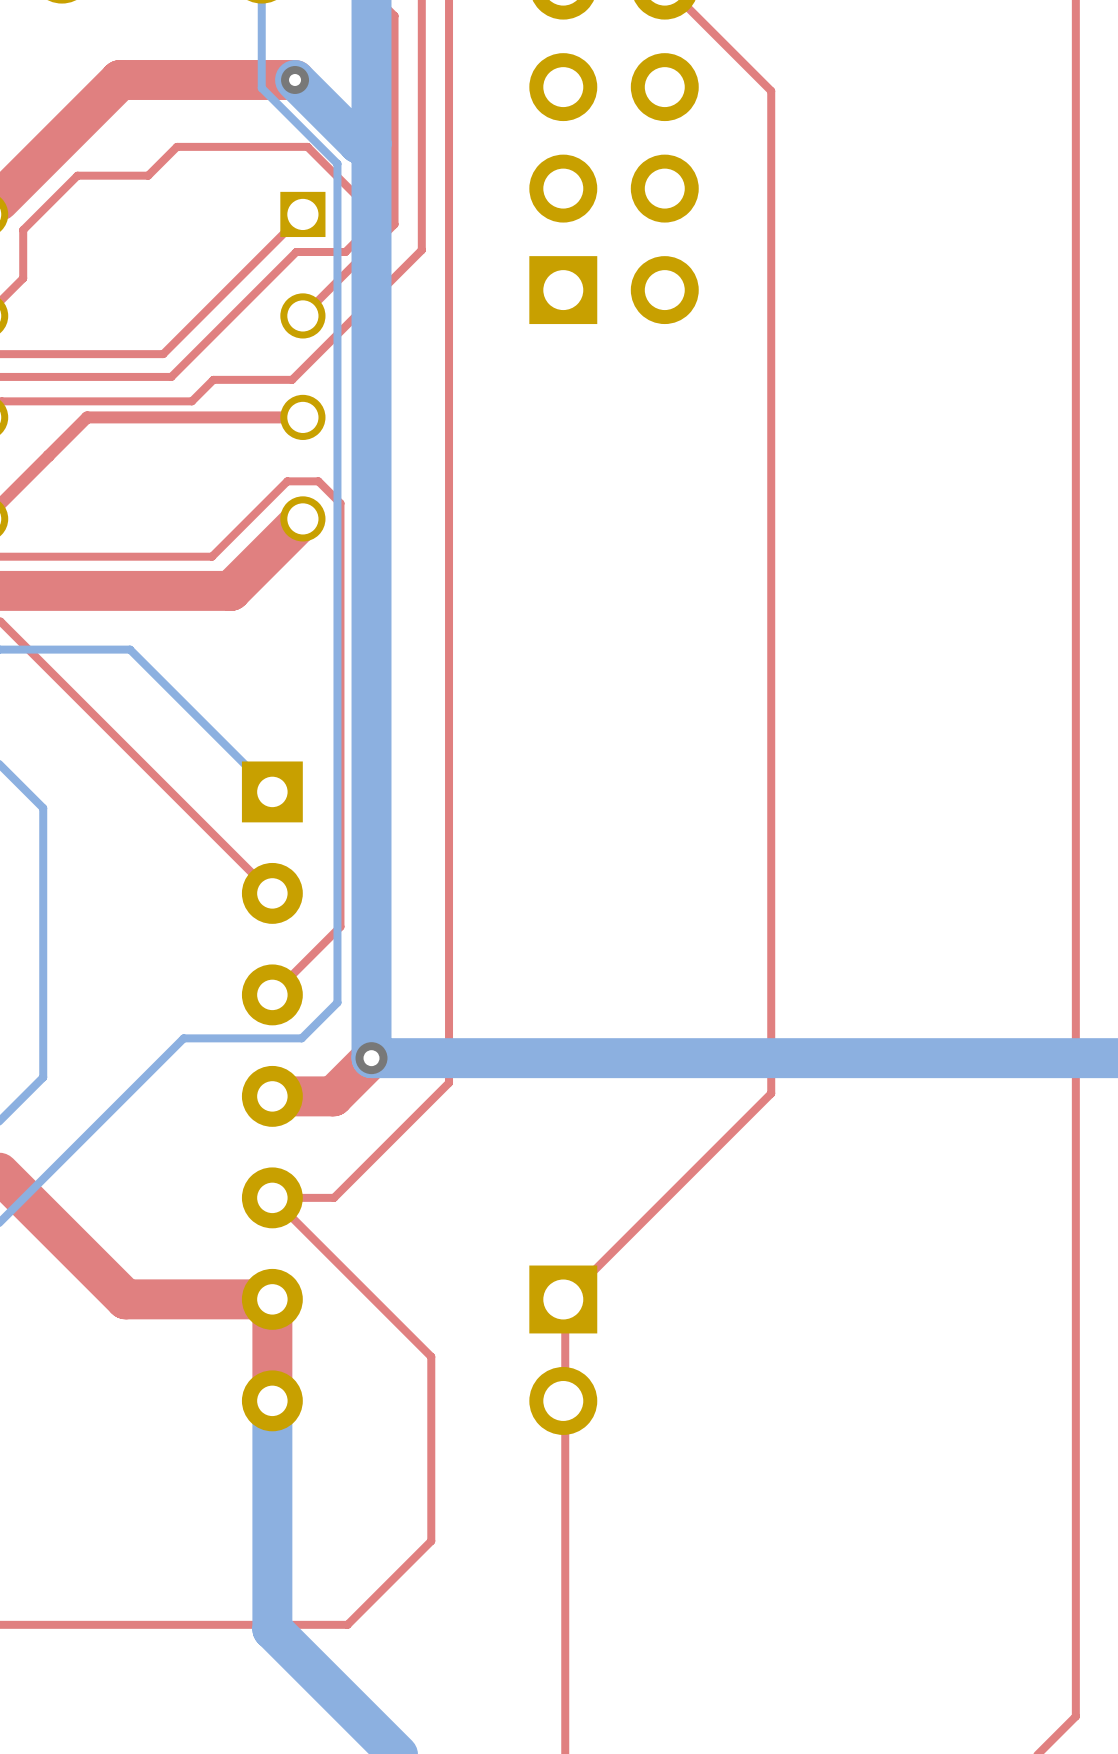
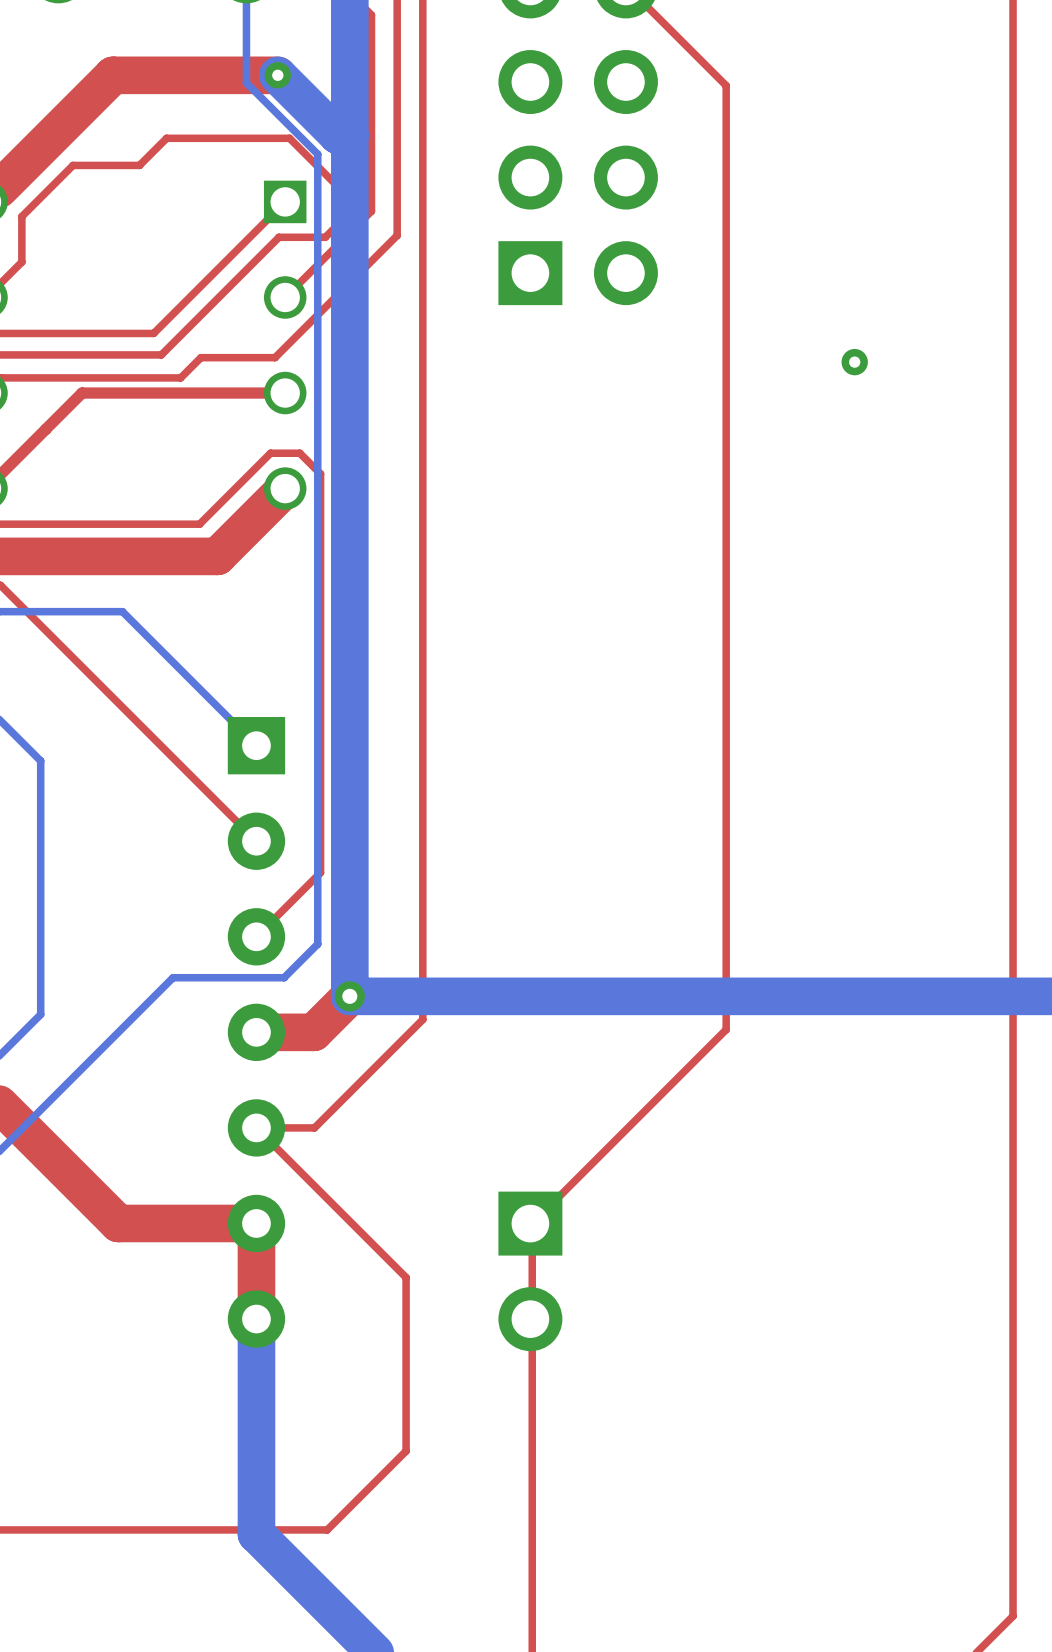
via: none -> (854, 362)

